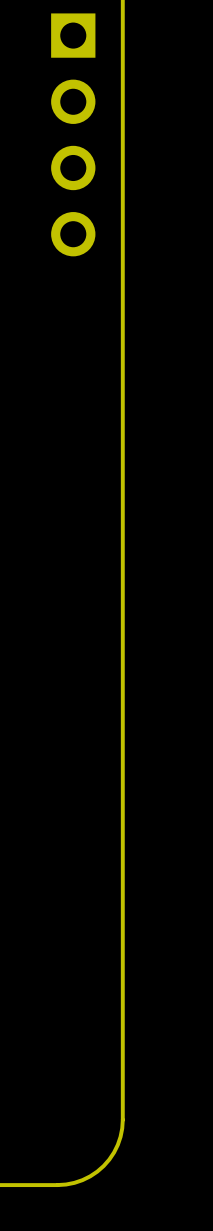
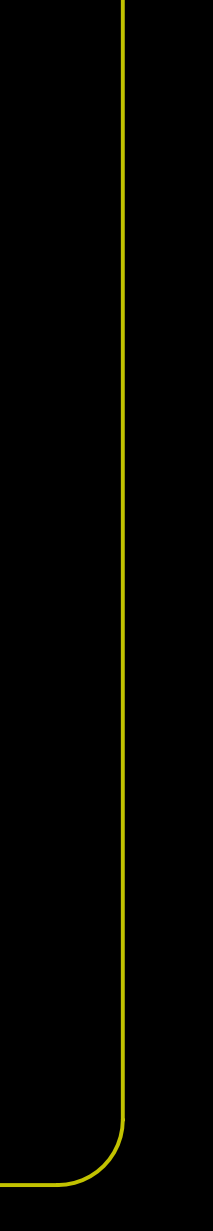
part: (73, 134) -> none

